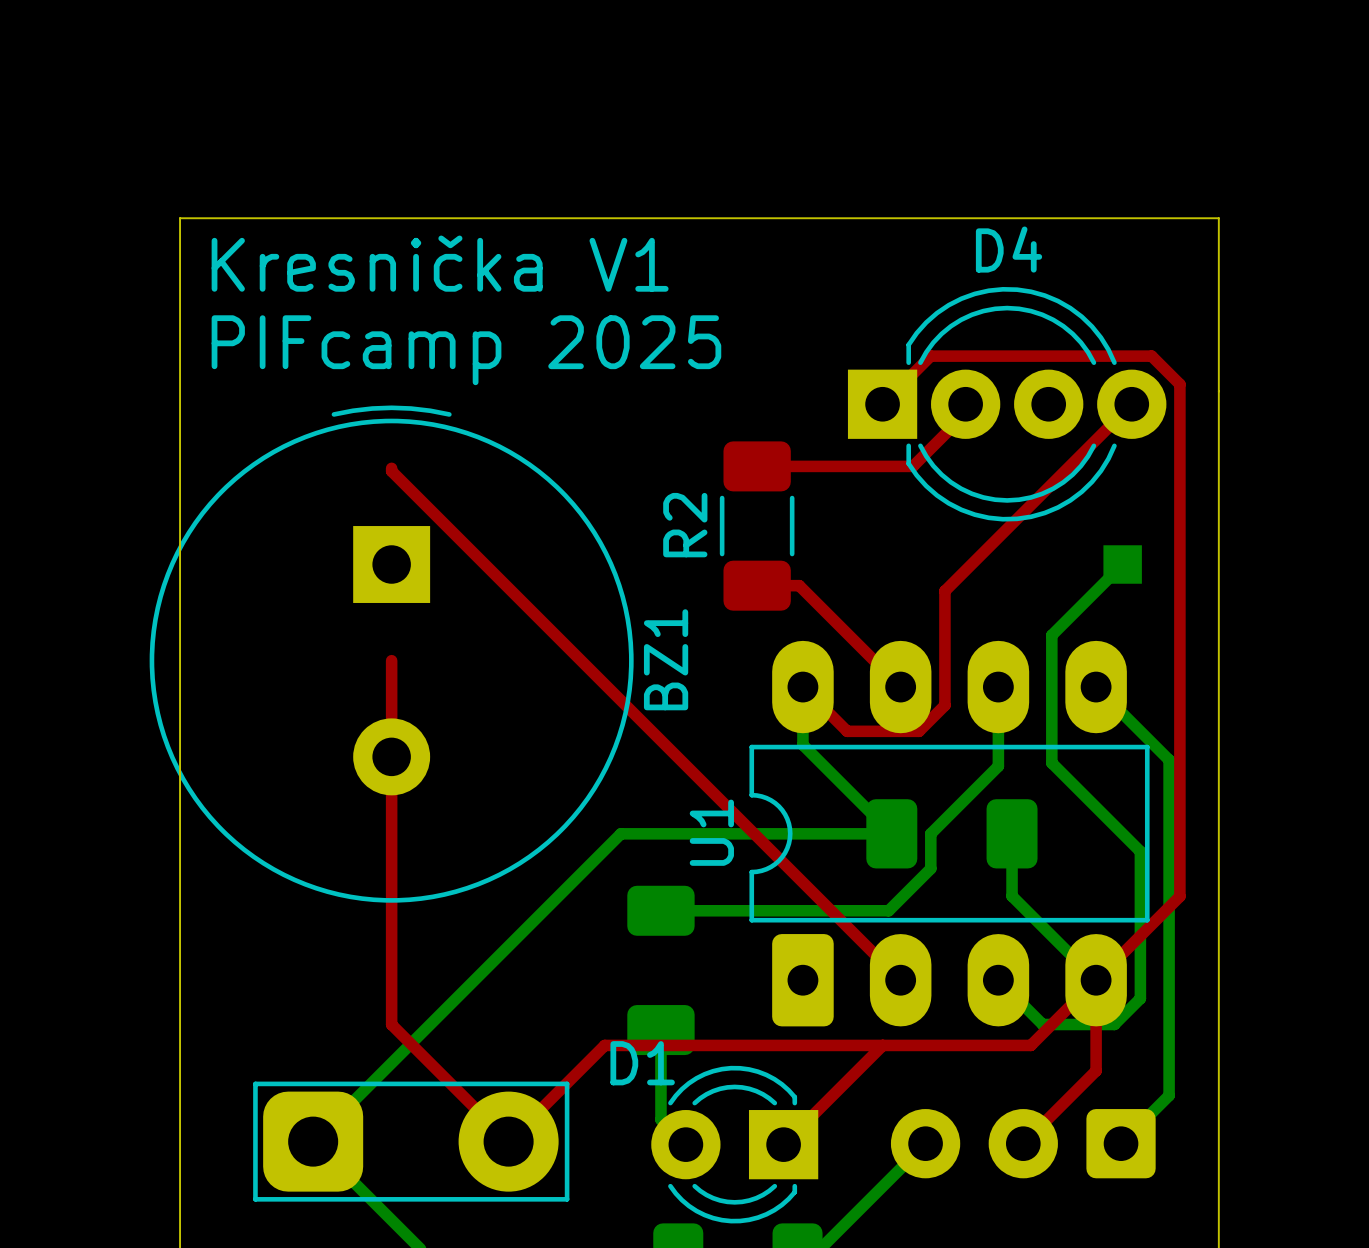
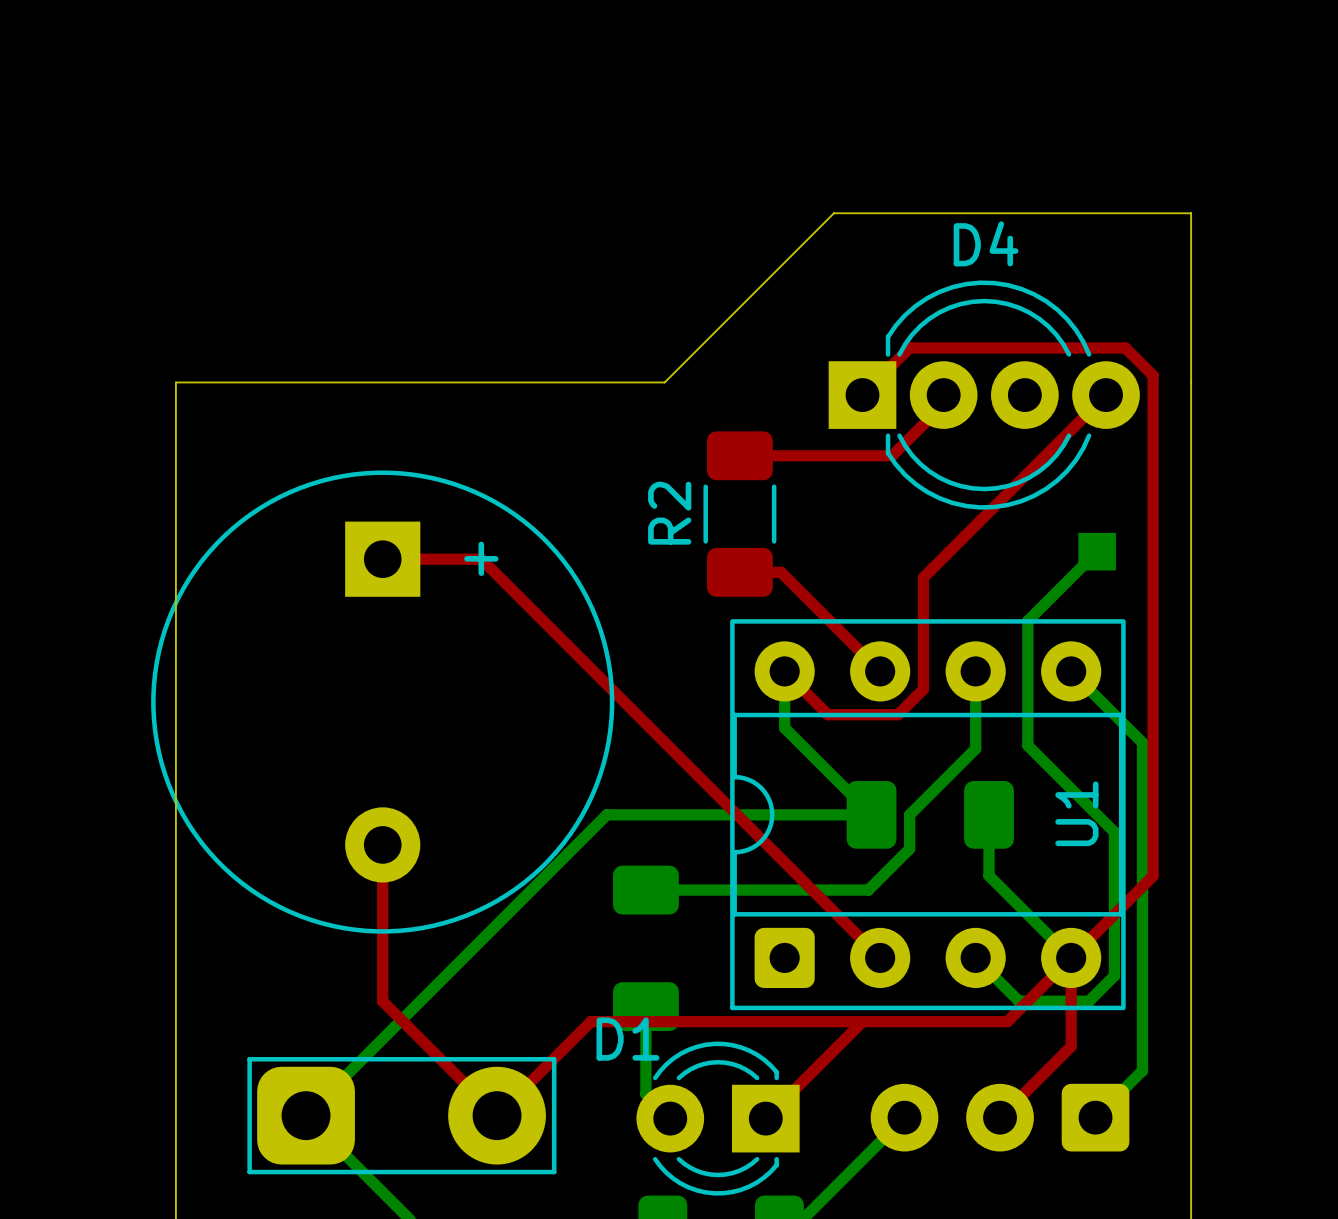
board edge: (853, 218) (180, 218) (180, 391) -> (833, 213) (664, 382) (175, 382)
text: Kresnička V1 (440, 263) -> none
text: PIFcamp 2025 (466, 350) -> none
top track: (391, 468) (391, 471) (492, 572) -> (382, 559) (481, 559)
U1 footprint: [749, 640, 1150, 1027] -> [730, 619, 1126, 1011]
BZ1: (391, 654) -> none
top track: (391, 660) (391, 864) -> none
part: none -> (382, 702)
U1 name position: U1 (711, 832) -> U1 (1076, 813)

